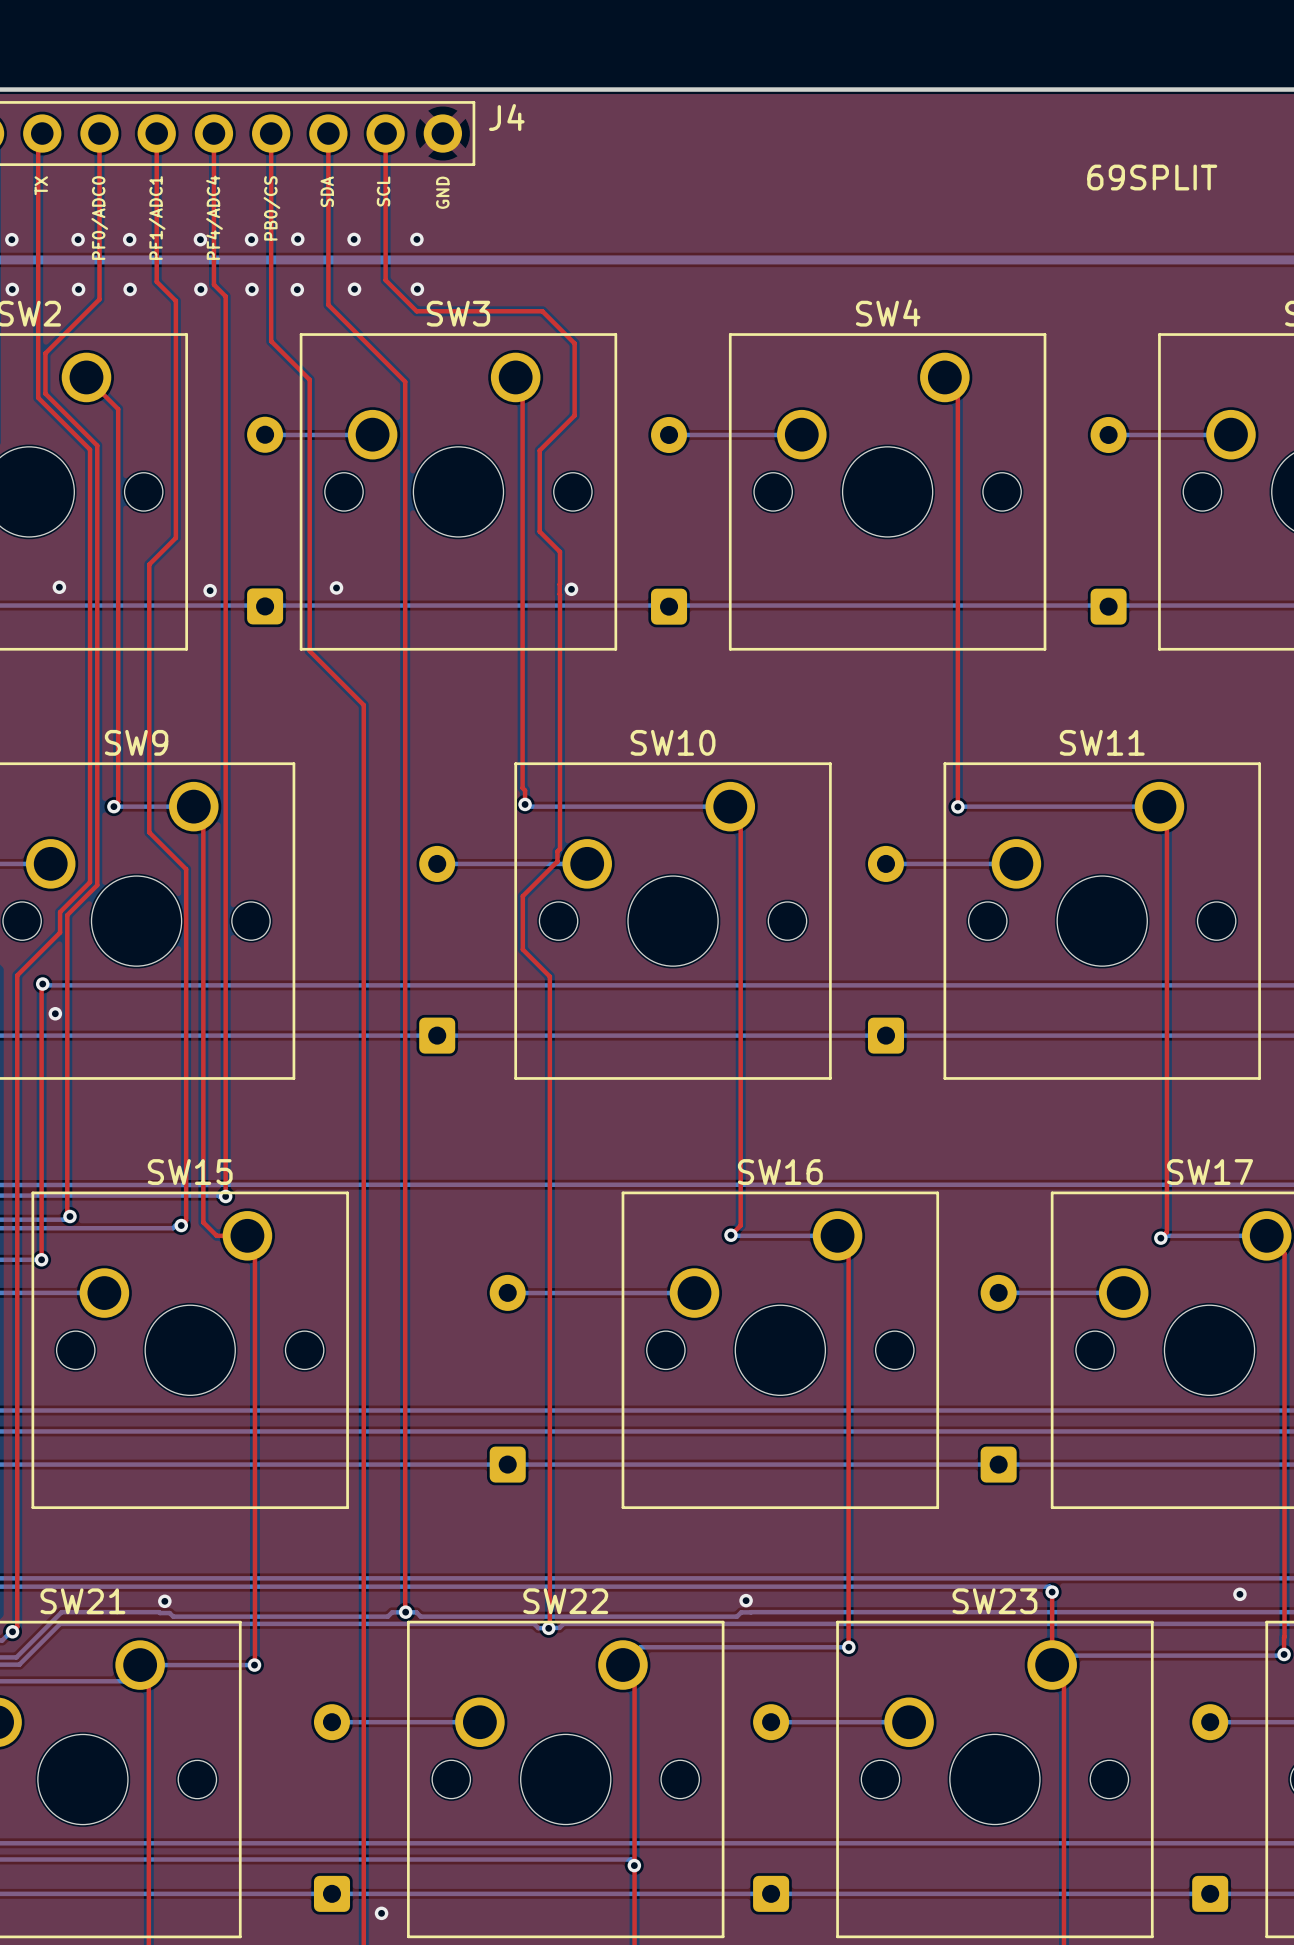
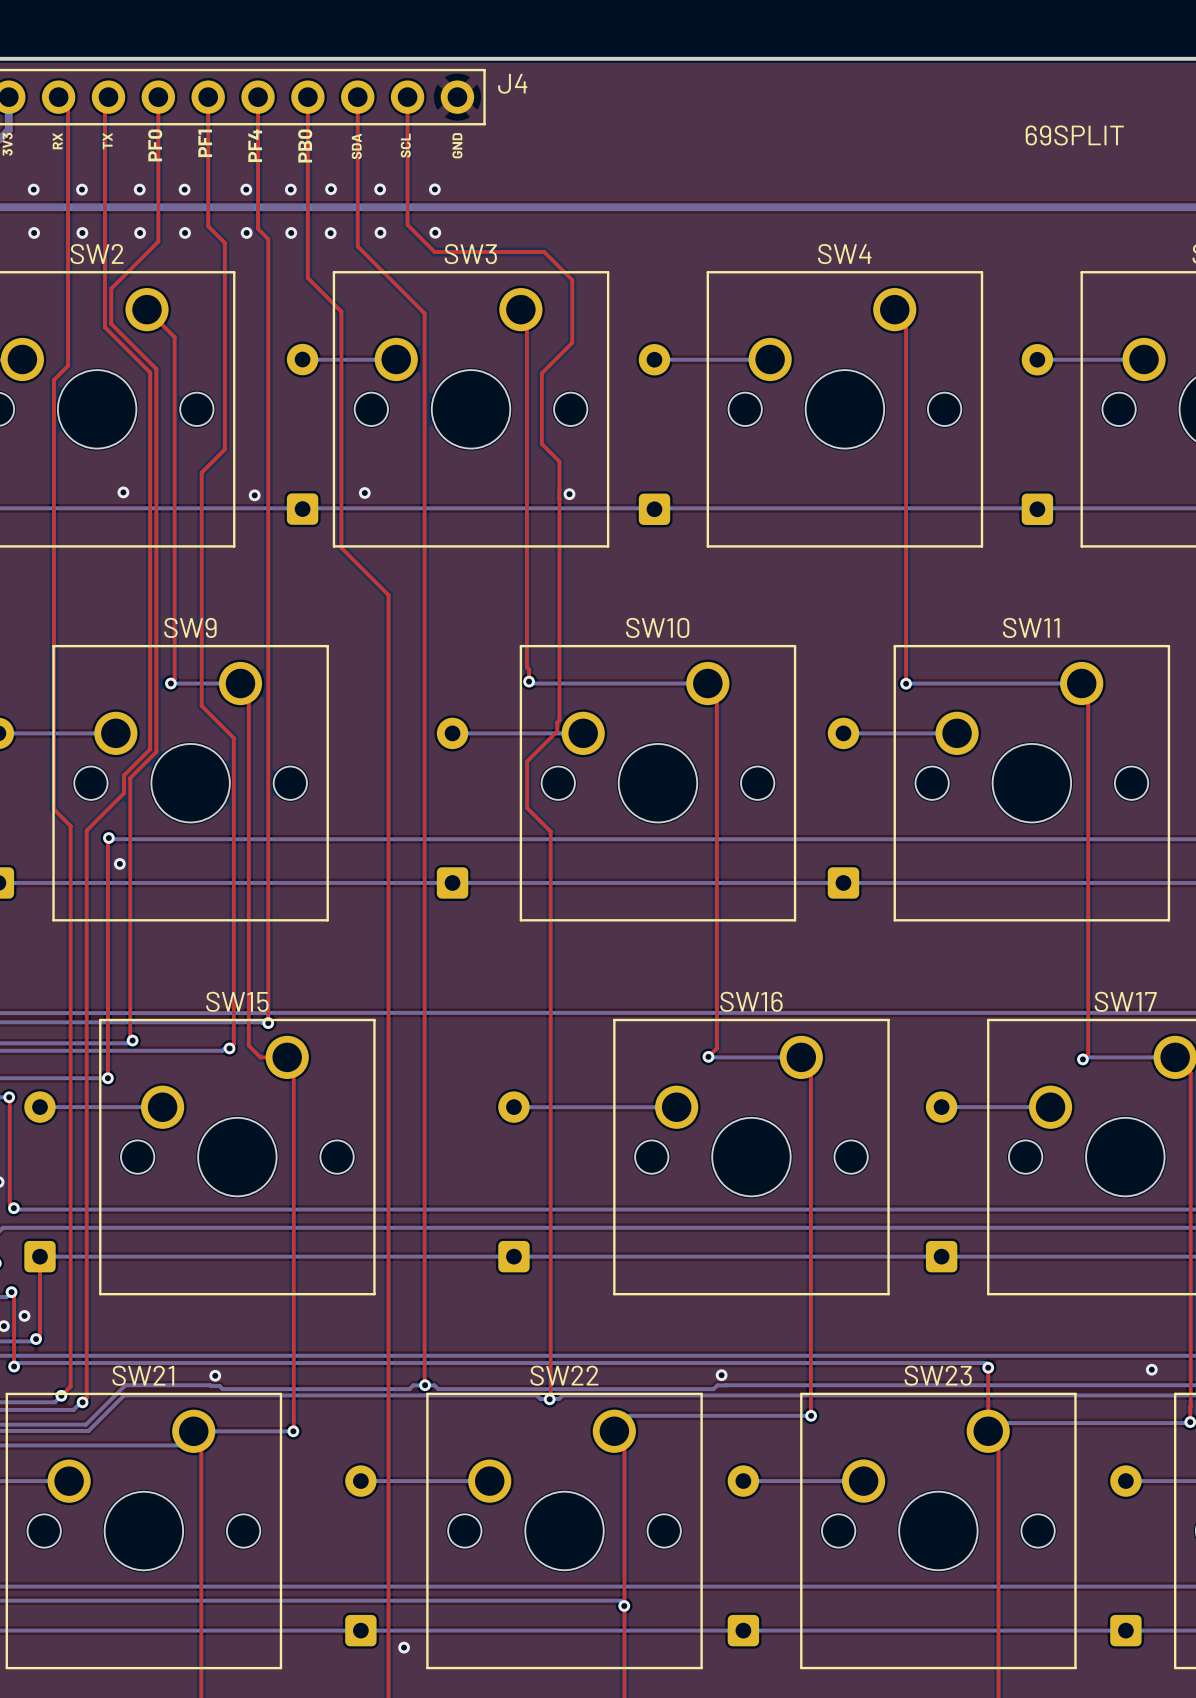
text: PB0/CS (271, 208) -> PB0 (305, 145)
text: PF4/ADC4 (214, 217) -> PF4 (255, 145)
text: PF0/ADC0 (99, 218) -> PF0 (155, 145)
text: PF1/ADC1 (157, 218) -> PF1 (205, 143)

